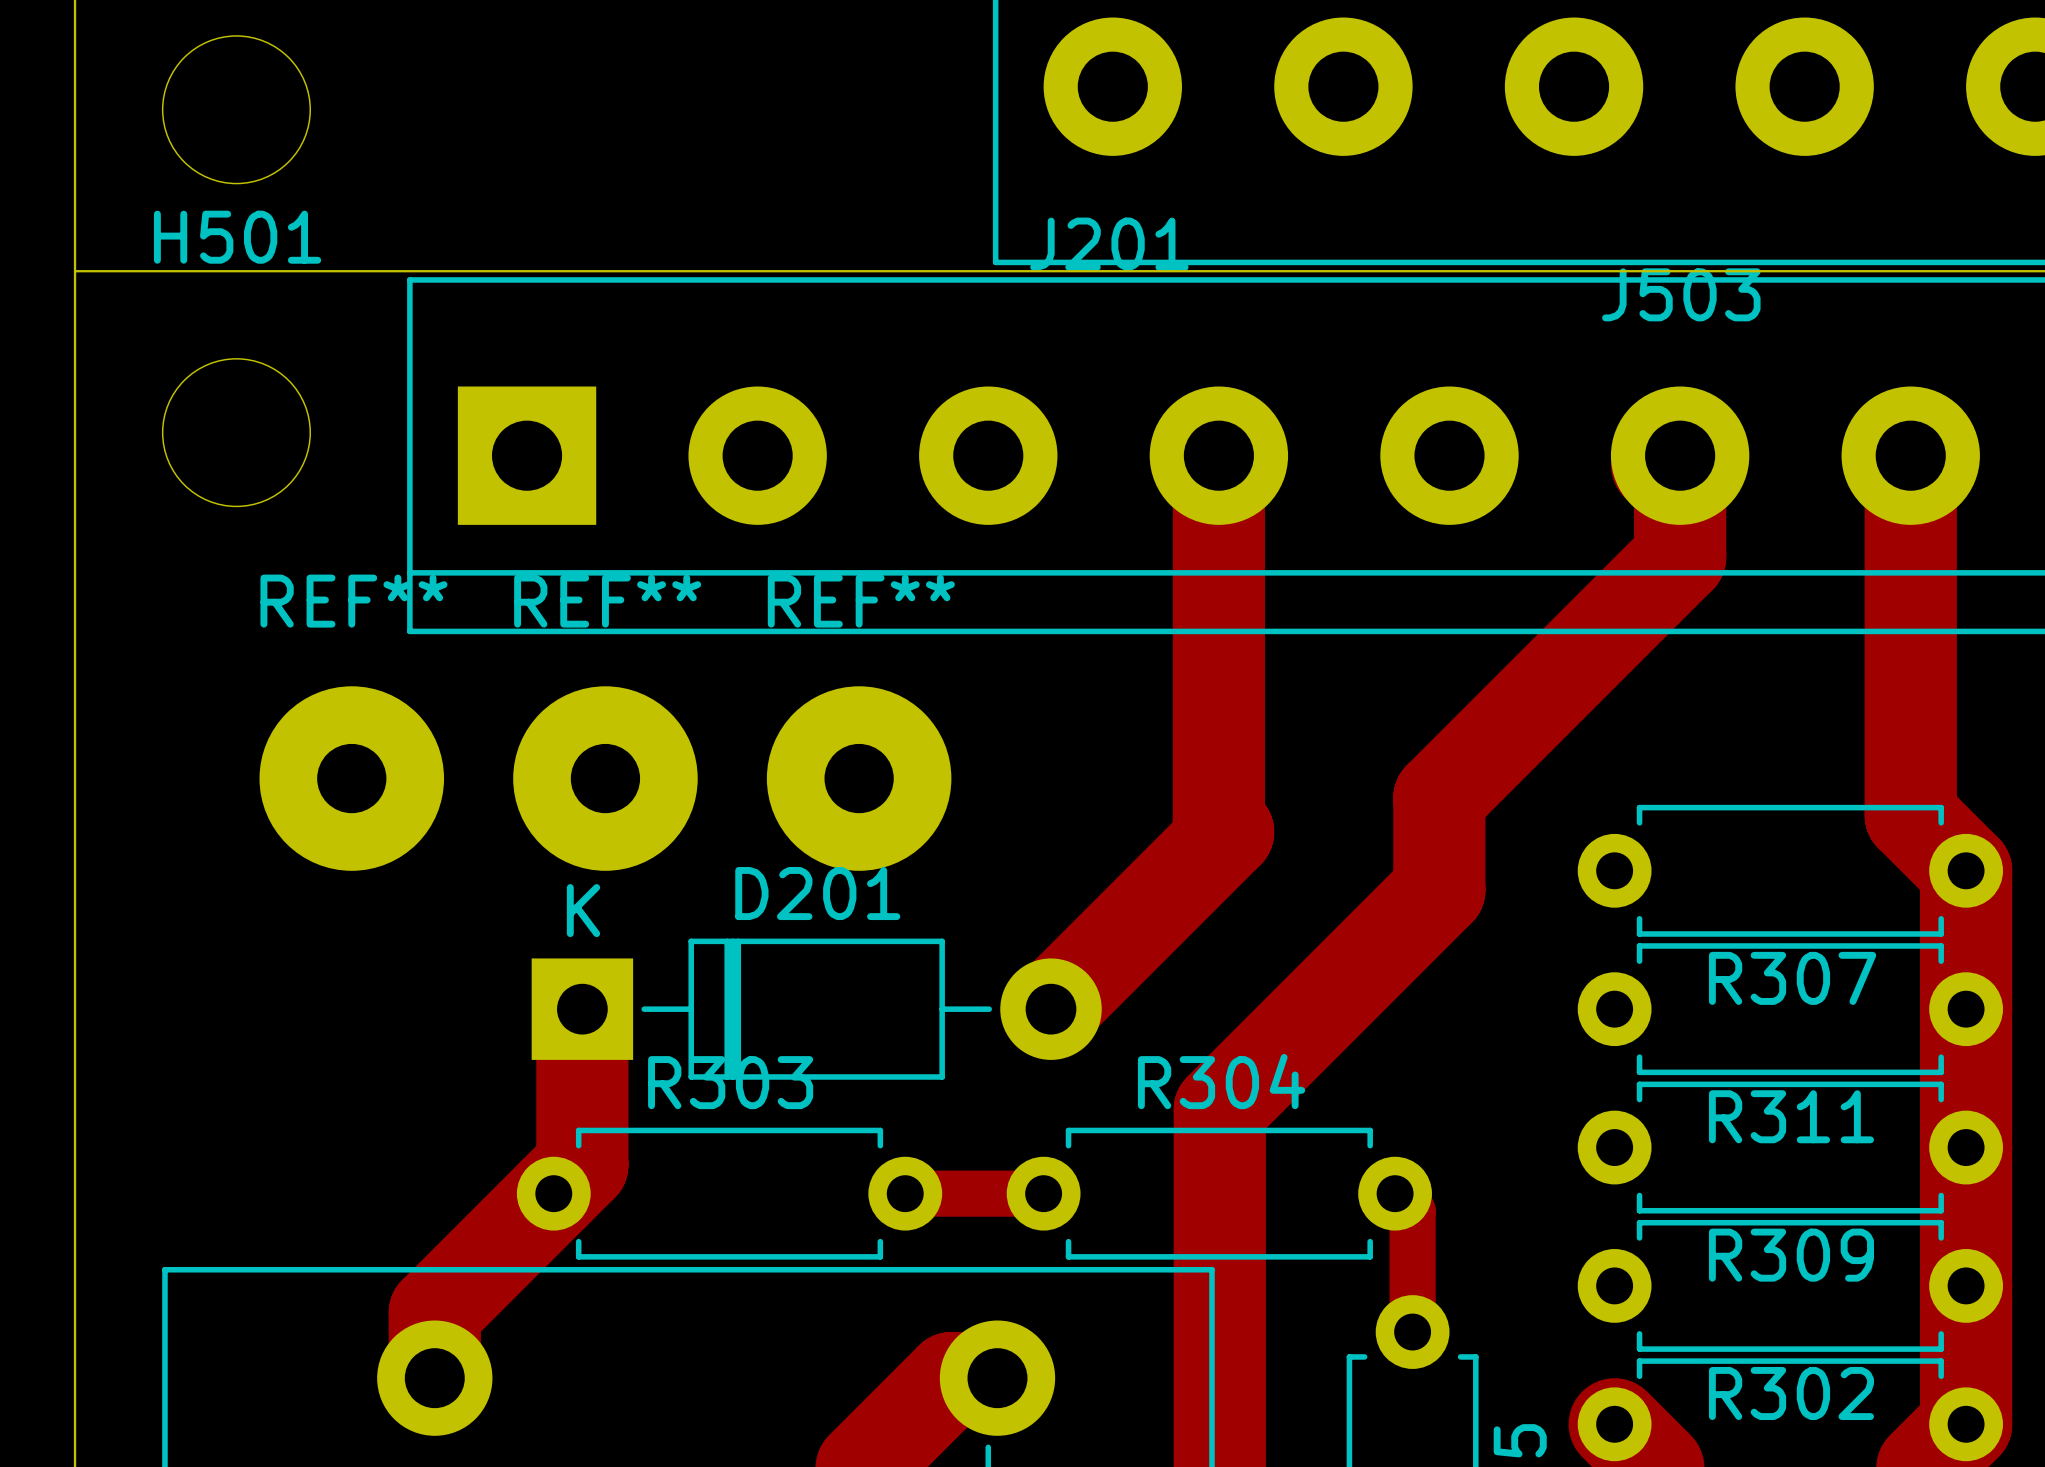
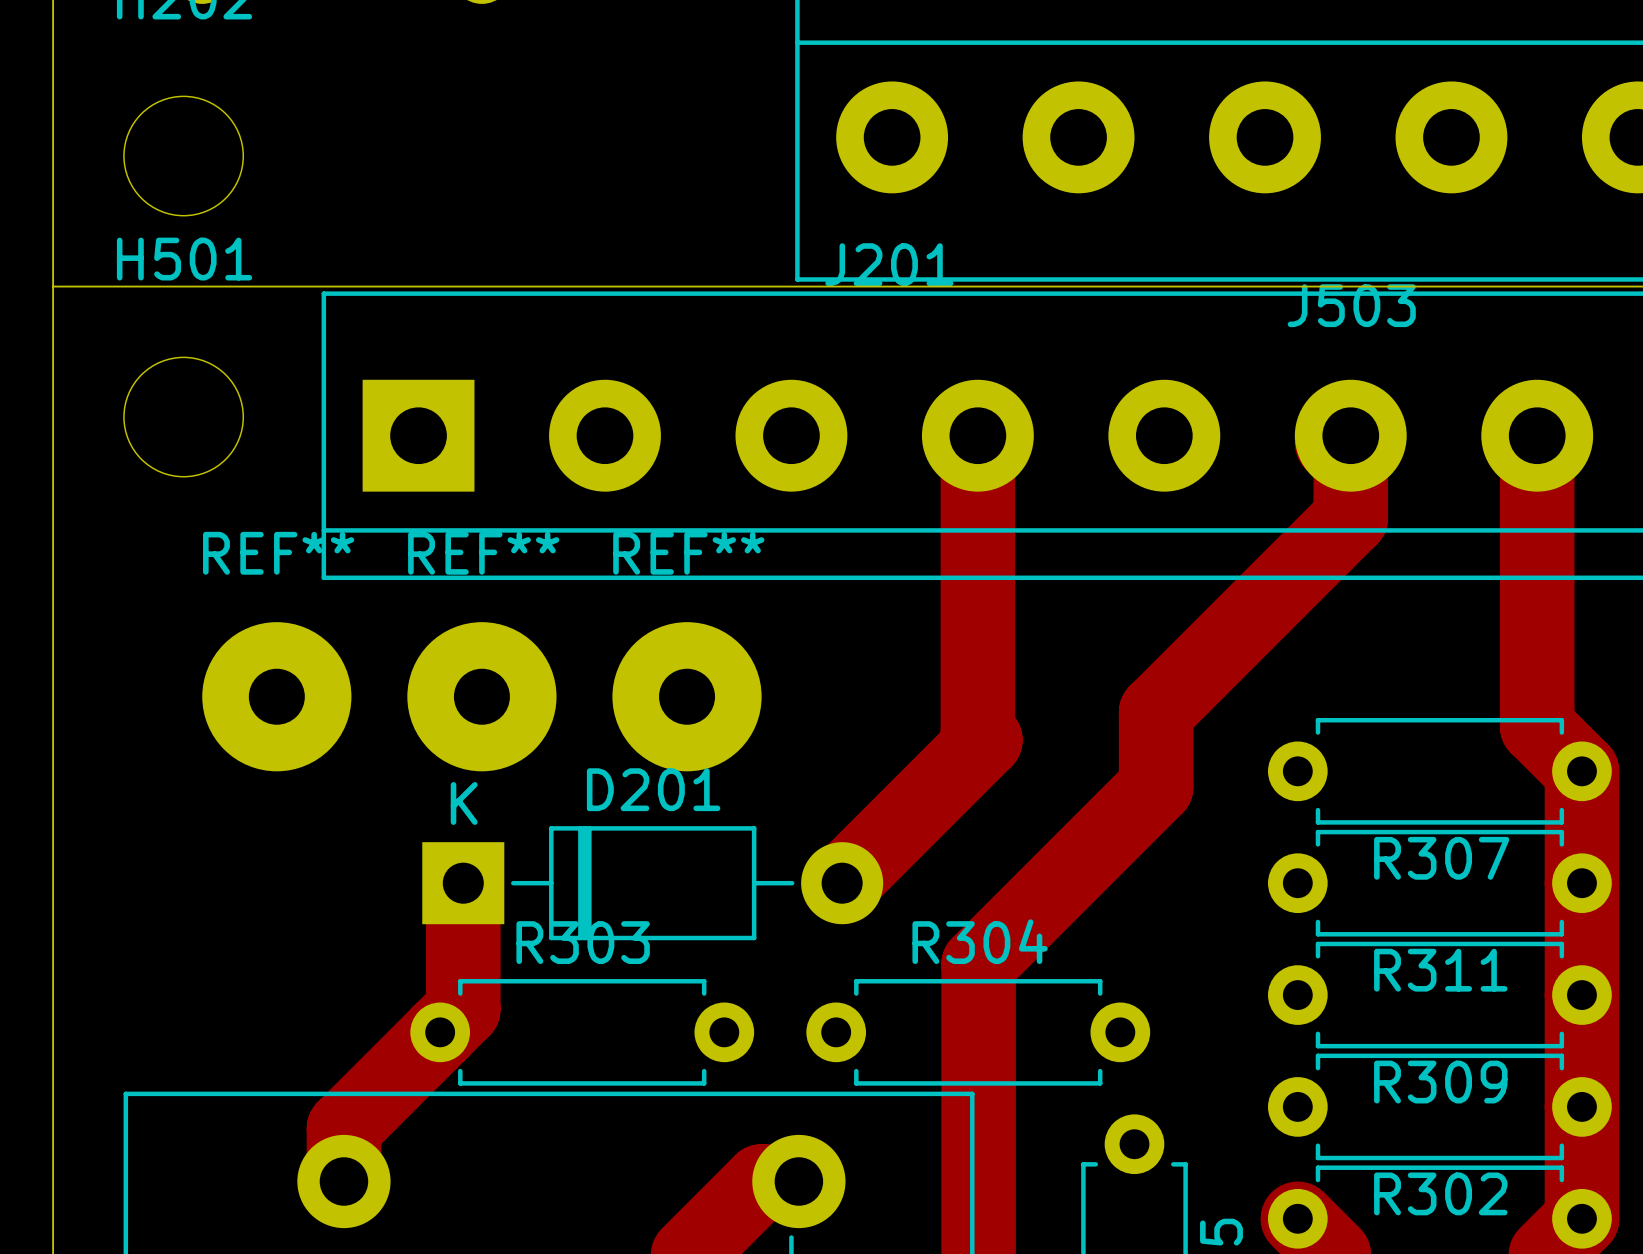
track: (905, 1193) (1043, 1193) -> none
track: (1395, 1193) (1412, 1211) (1412, 1332) -> none

